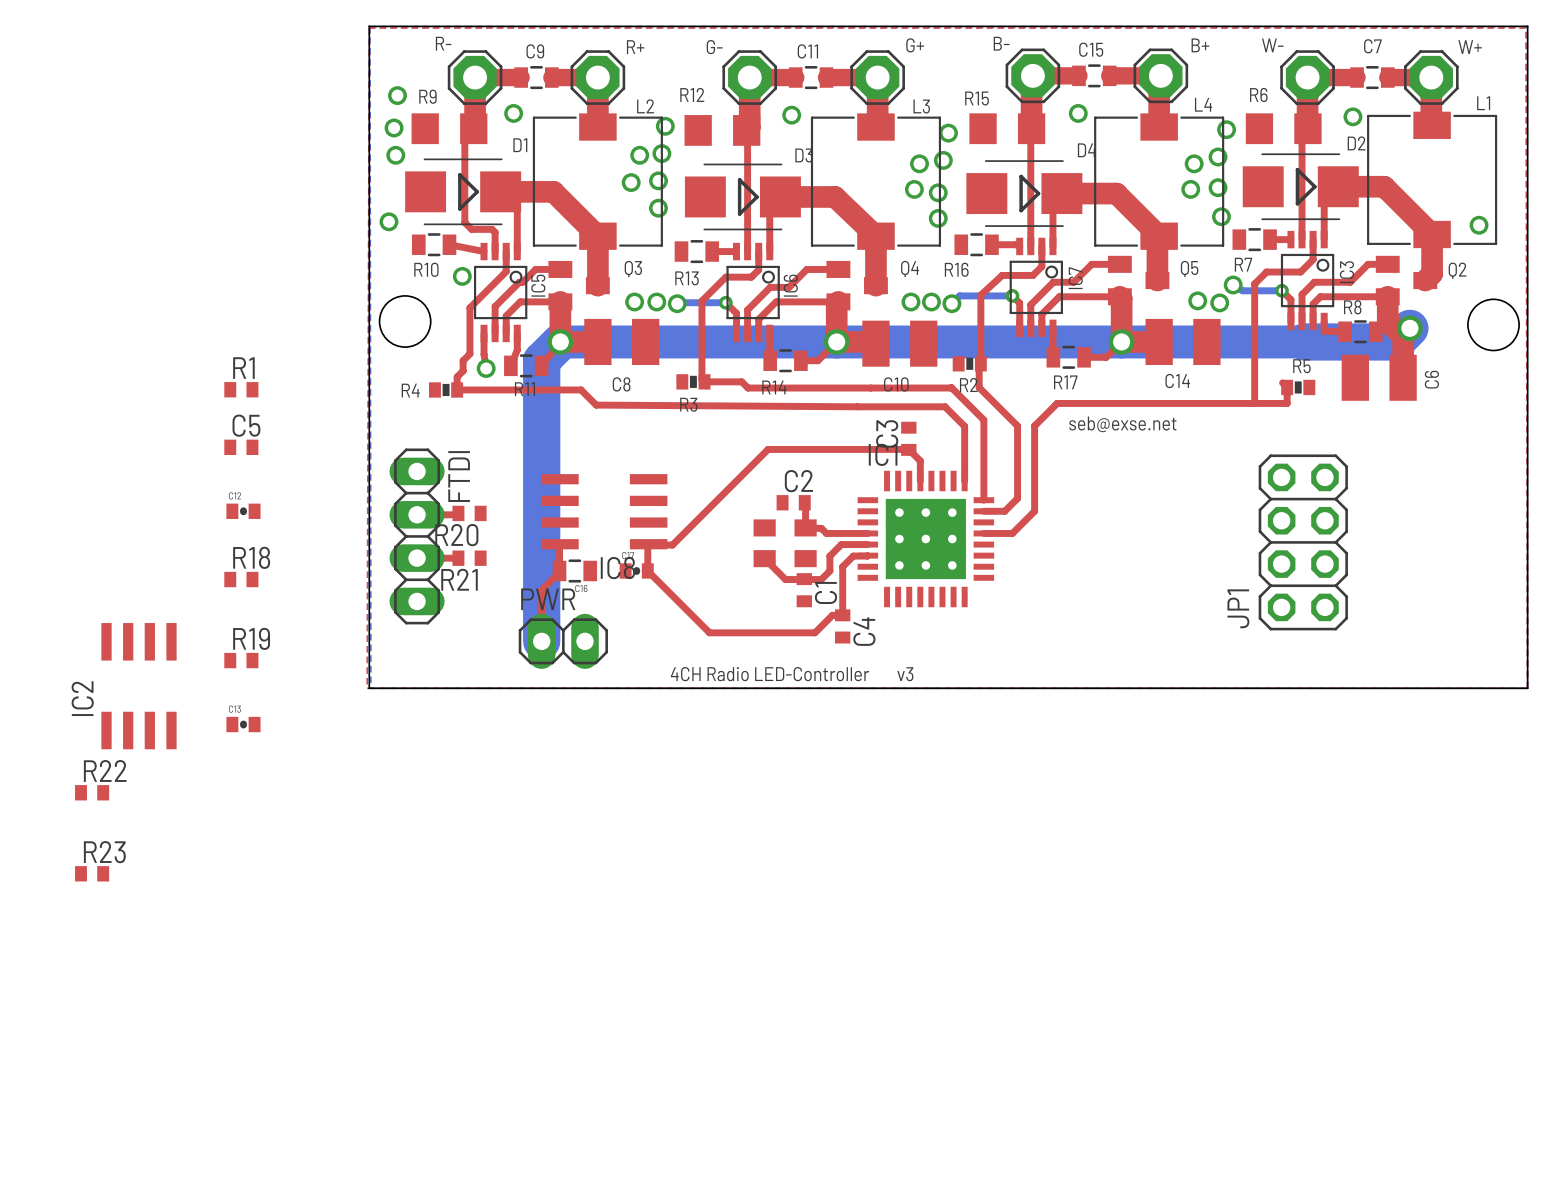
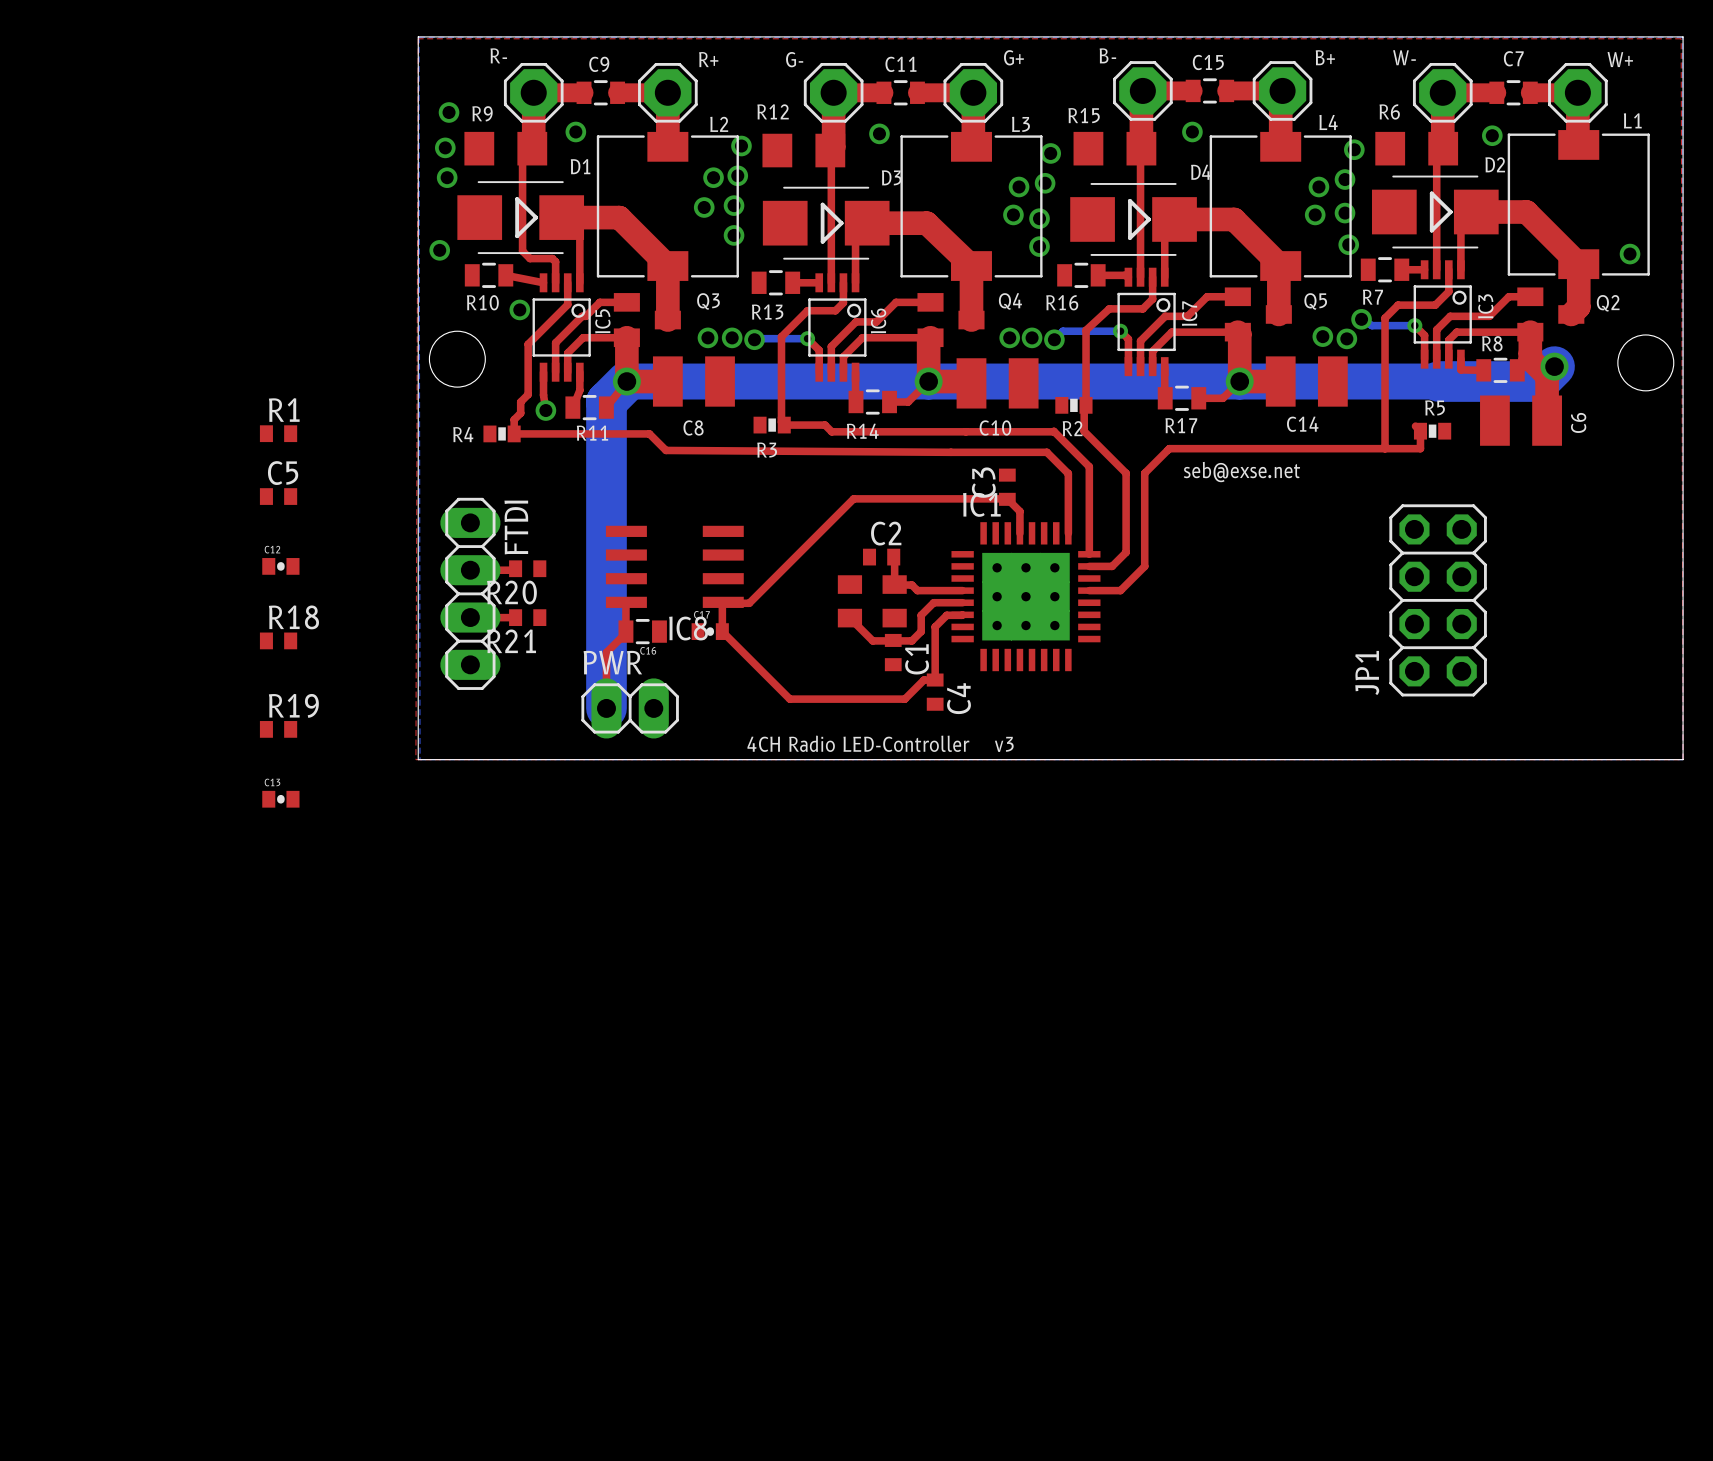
IC2: (139, 686) -> none
R22: (92, 792) -> none
R23: (92, 873) -> none

